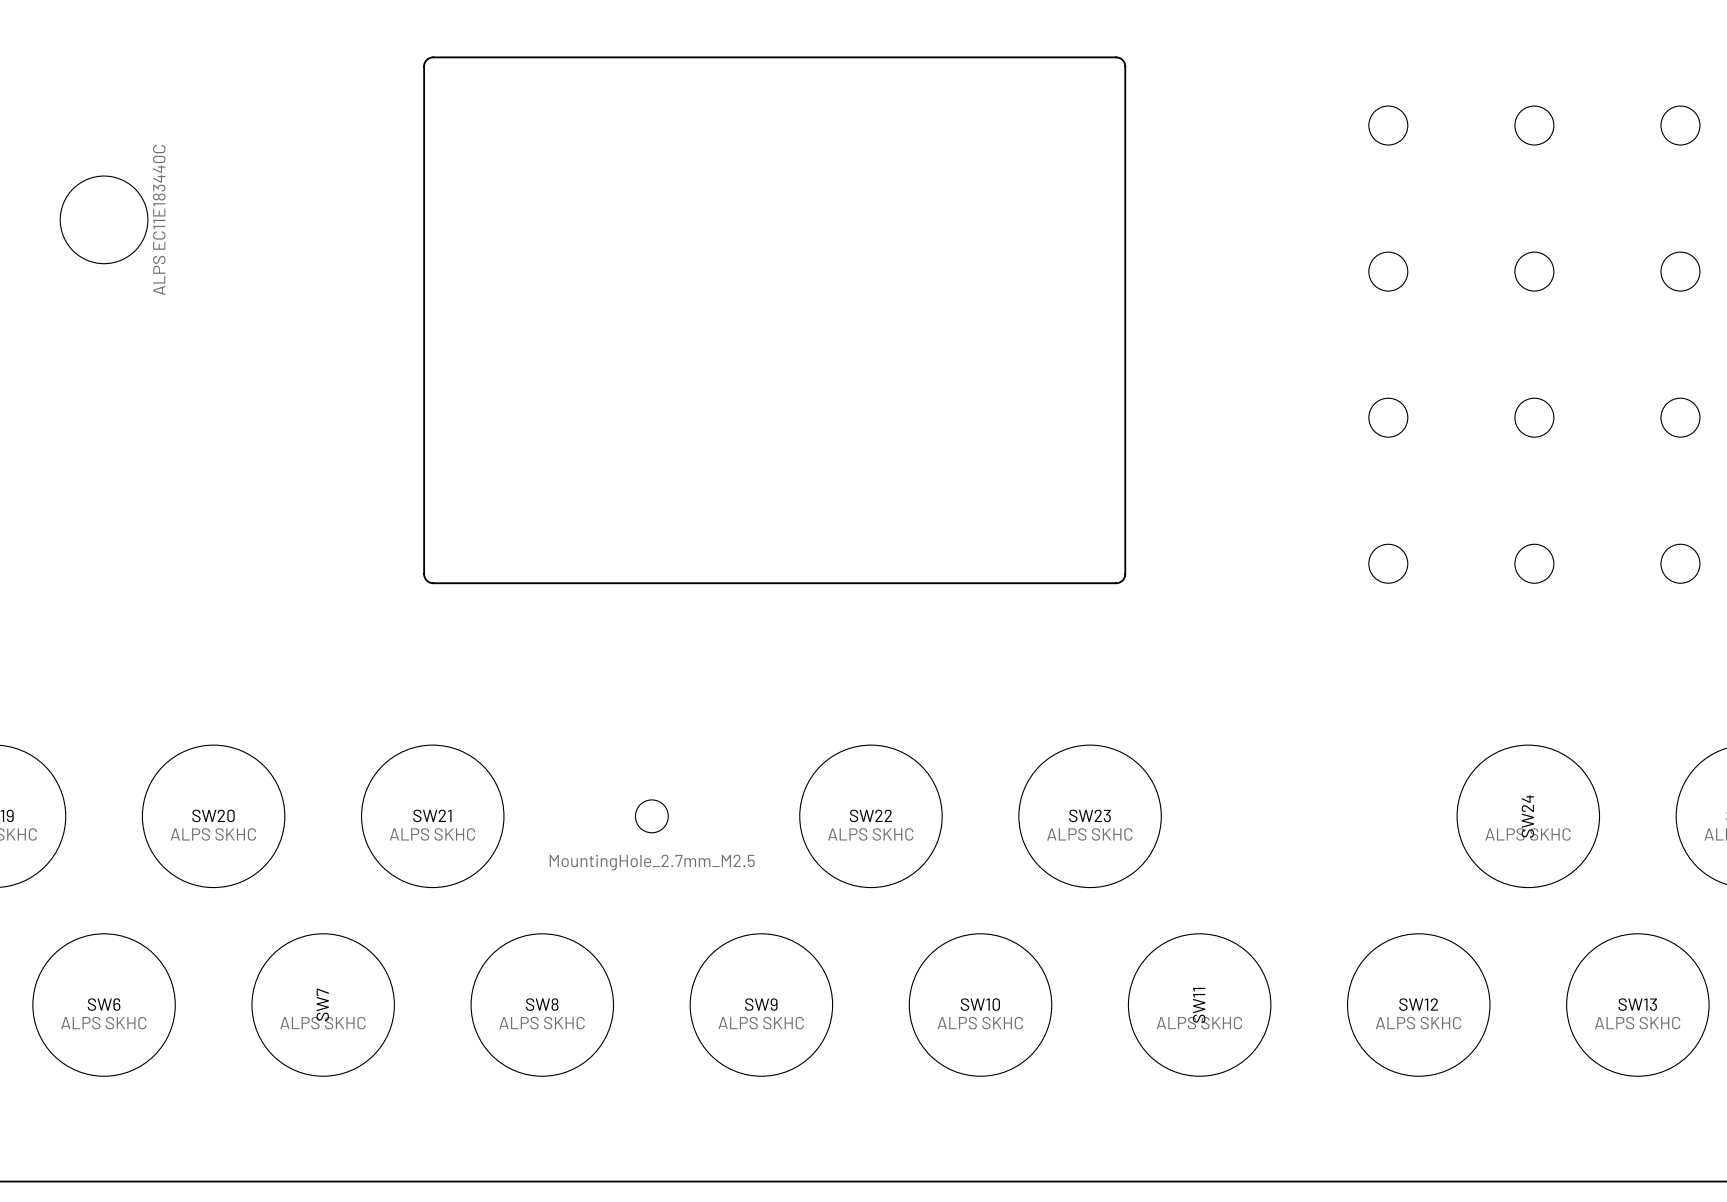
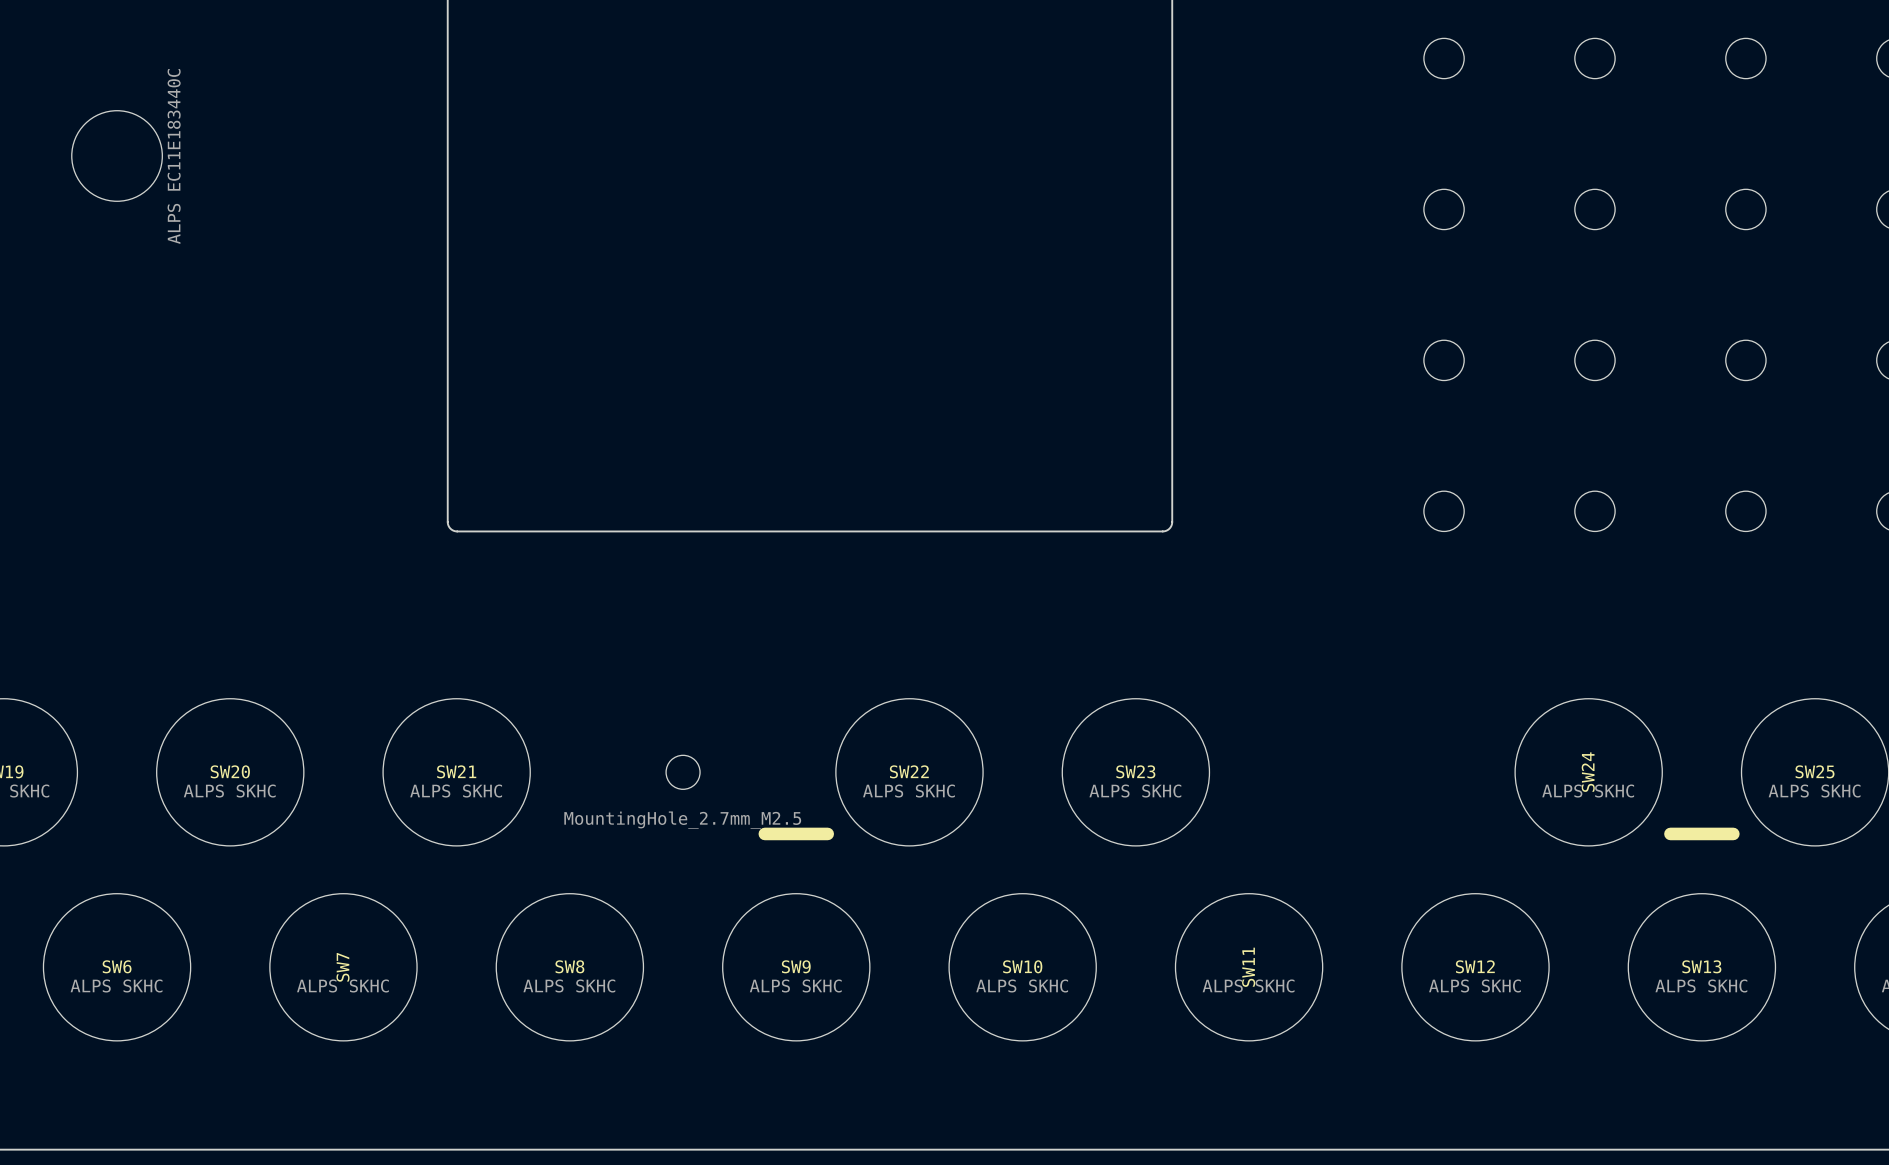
line: none -> (764, 833) (827, 833)
line: none -> (1670, 833) (1733, 833)

